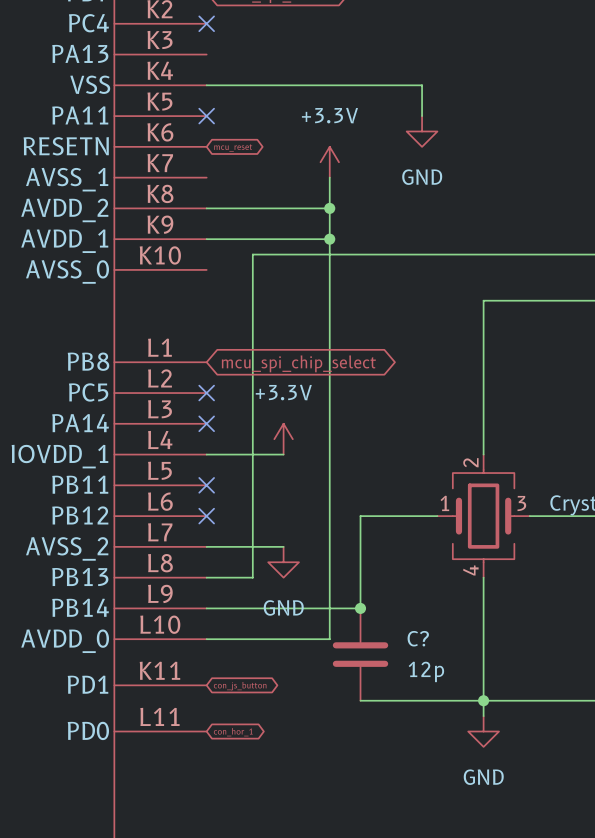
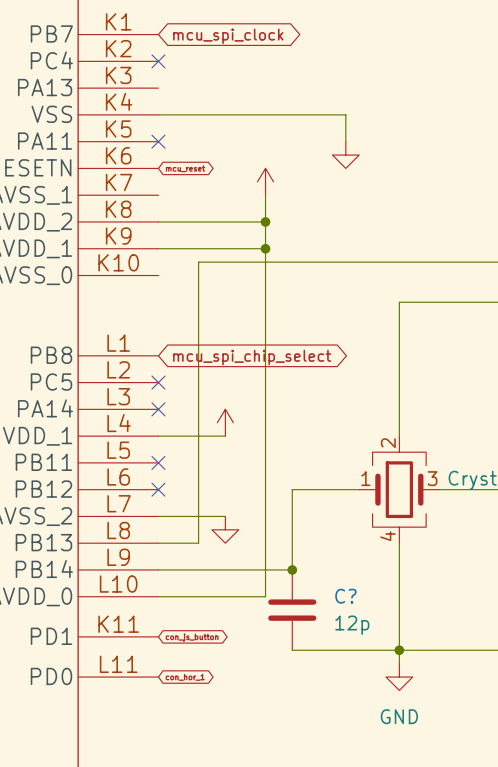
power symbol text: +3.3V (329, 115) -> none
power symbol text: GND (422, 177) -> none
power symbol text: +3.3V (283, 392) -> none
power symbol text: GND (283, 607) -> none

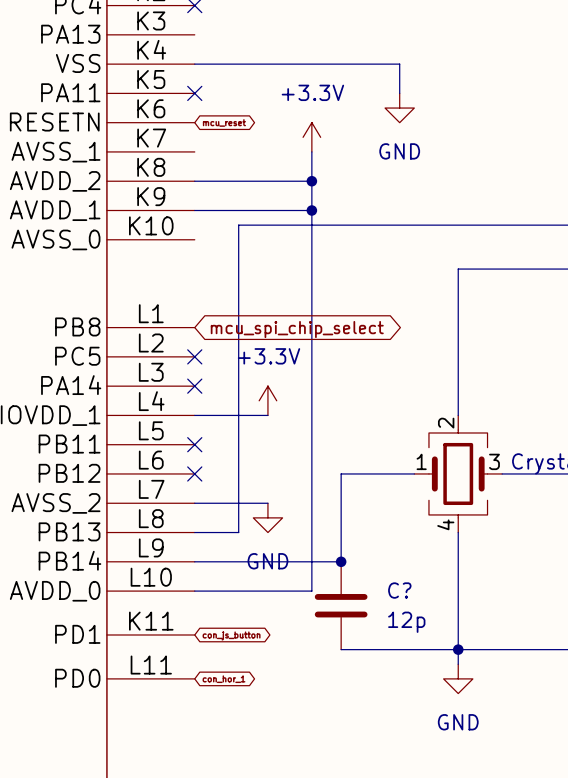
power symbol text: none -> +3.3V (312, 92)
power symbol text: none -> GND (399, 151)
power symbol text: none -> +3.3V (269, 356)
power symbol text: none -> GND (267, 561)

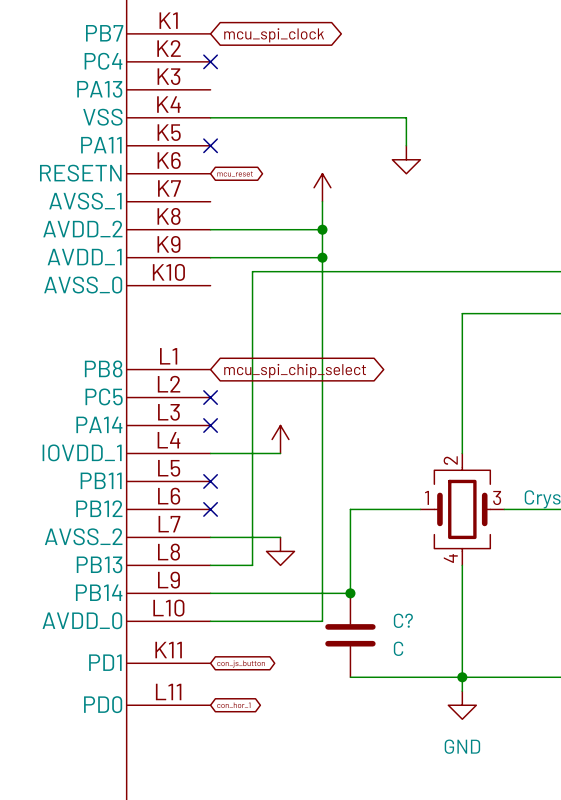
power symbol text: +3.3V (312, 92) -> none
power symbol text: GND (399, 151) -> none
power symbol text: +3.3V (269, 356) -> none
power symbol text: GND (267, 561) -> none
C? value: 12p (406, 622) -> C (398, 648)

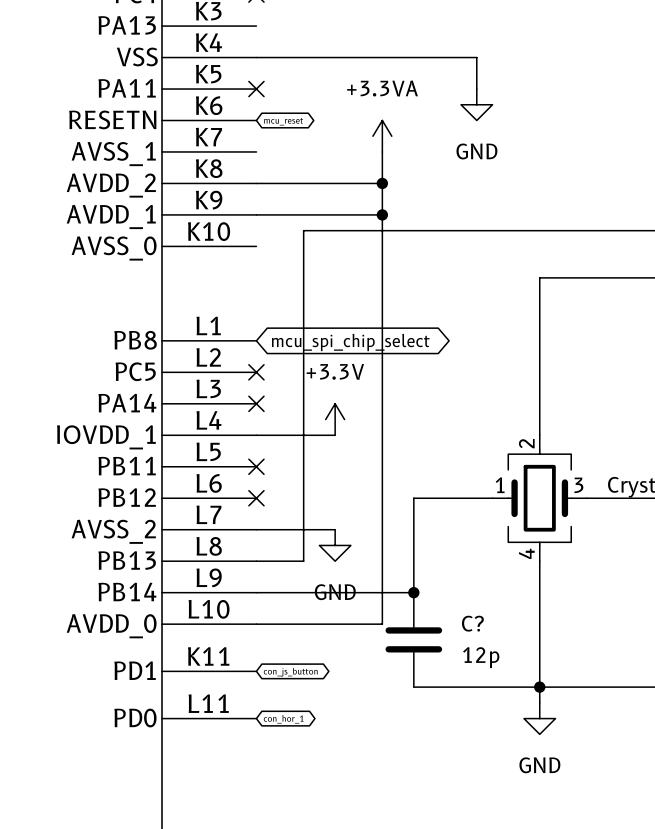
power symbol text: none -> +3.3VA (382, 88)
power symbol text: none -> GND (476, 151)
power symbol text: none -> +3.3V (335, 371)
power symbol text: none -> GND (335, 592)
C? value: C (398, 648) -> 12p (481, 657)

